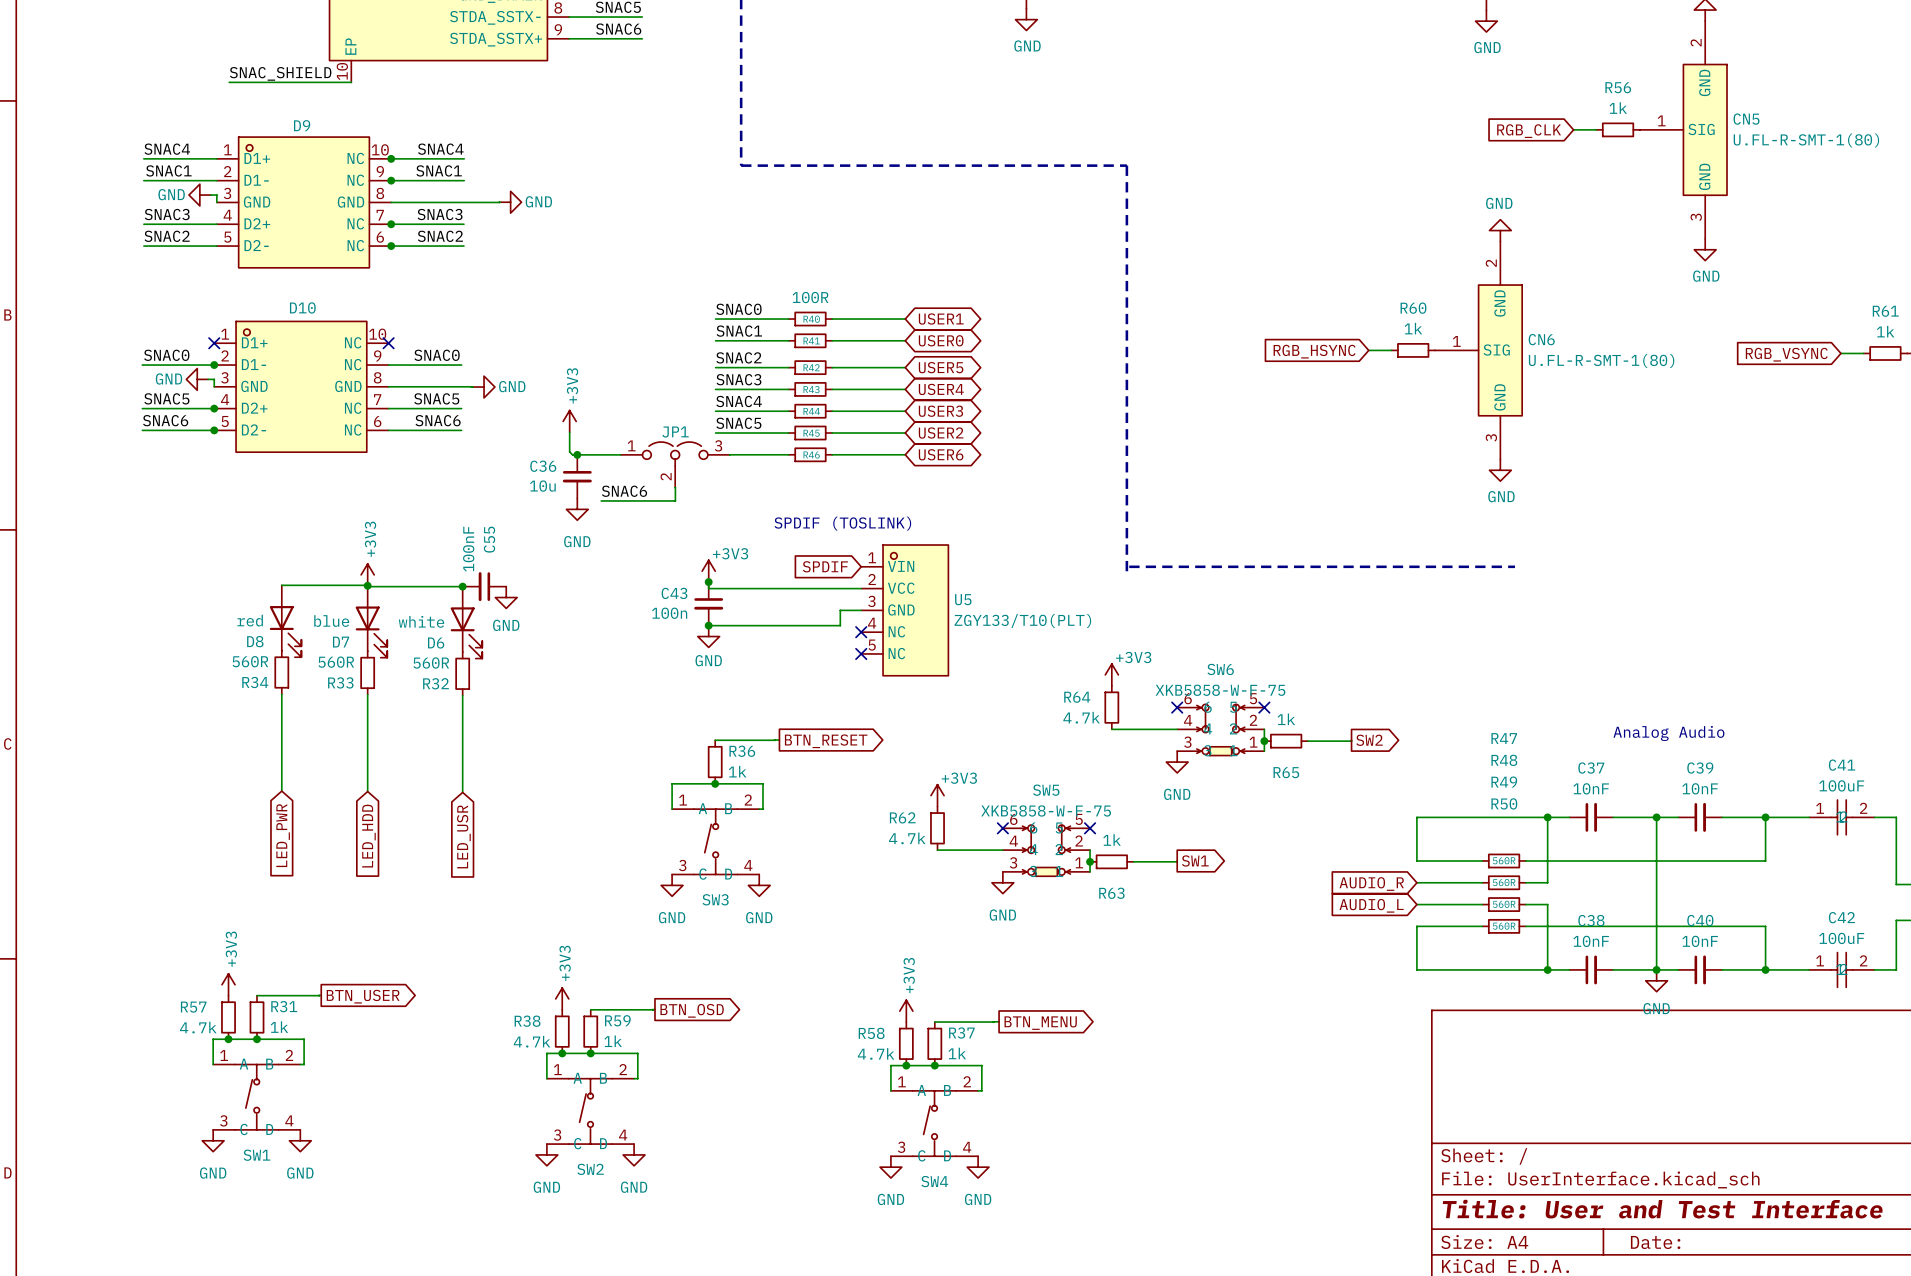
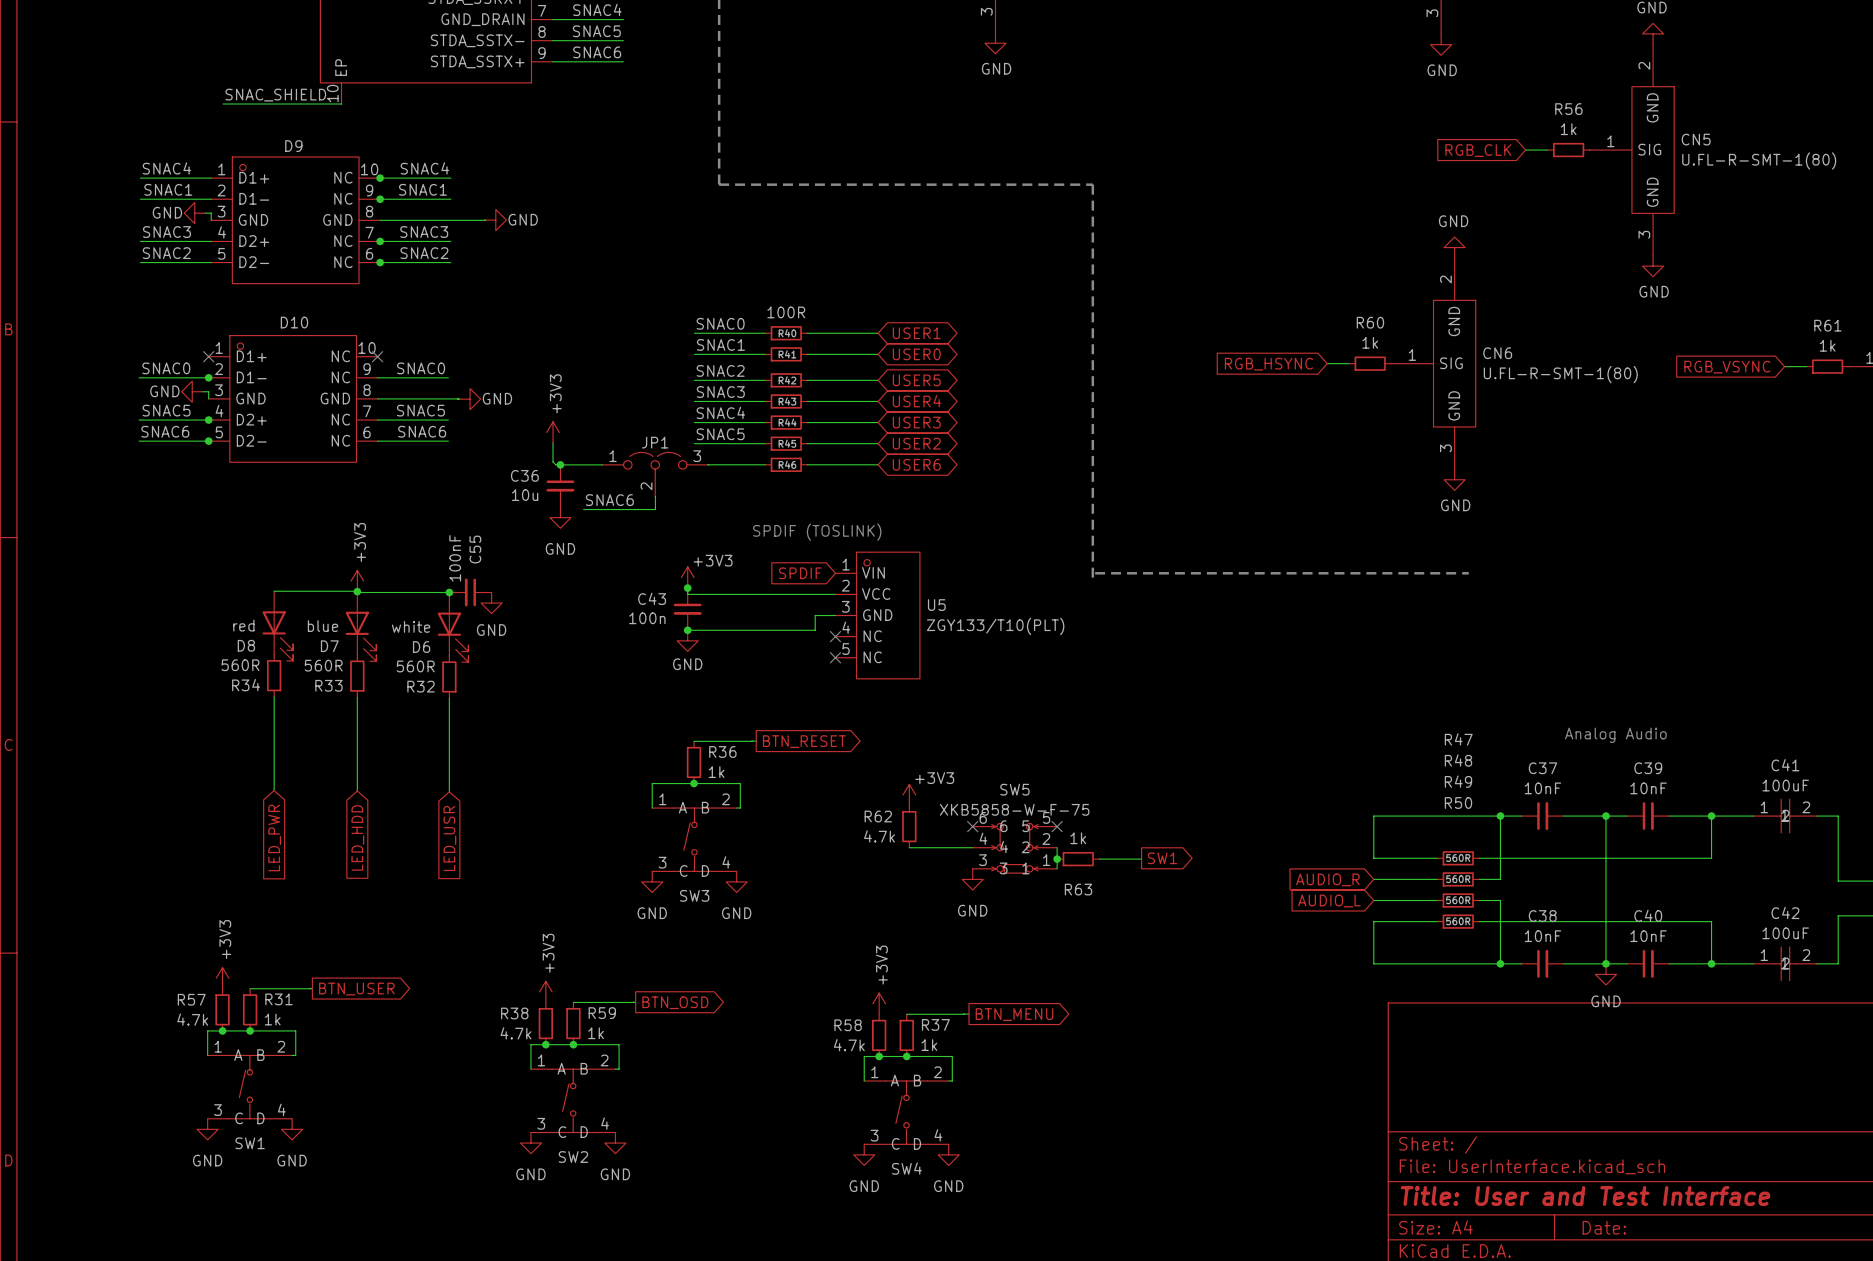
power symbol: +3V3 (1111, 674) -> none
R64: 4.7k (1111, 707) -> none
no-connect mark: (1177, 707) -> none
no-connect mark: (1264, 707) -> none
wire: (1111, 729) (1177, 729) -> none
SW6: XKB5858-W-F-75 (1220, 729) -> none
wire: (1264, 729) (1264, 751) -> none
wire: (1351, 740) (1307, 741) -> none
global label: SW2 (1369, 740) -> none
junction: (1264, 741) -> none
R65: 1k (1286, 741) -> none
power symbol: GND (1177, 762) -> none

